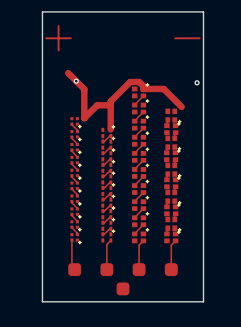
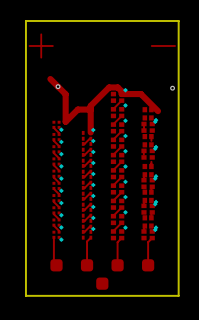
part: none -> (149, 115)
part: (172, 117) -> none
part: none -> (149, 125)
part: (172, 127) -> none
part: none -> (149, 142)
part: (172, 144) -> none
part: none -> (149, 152)
part: (172, 154) -> none

